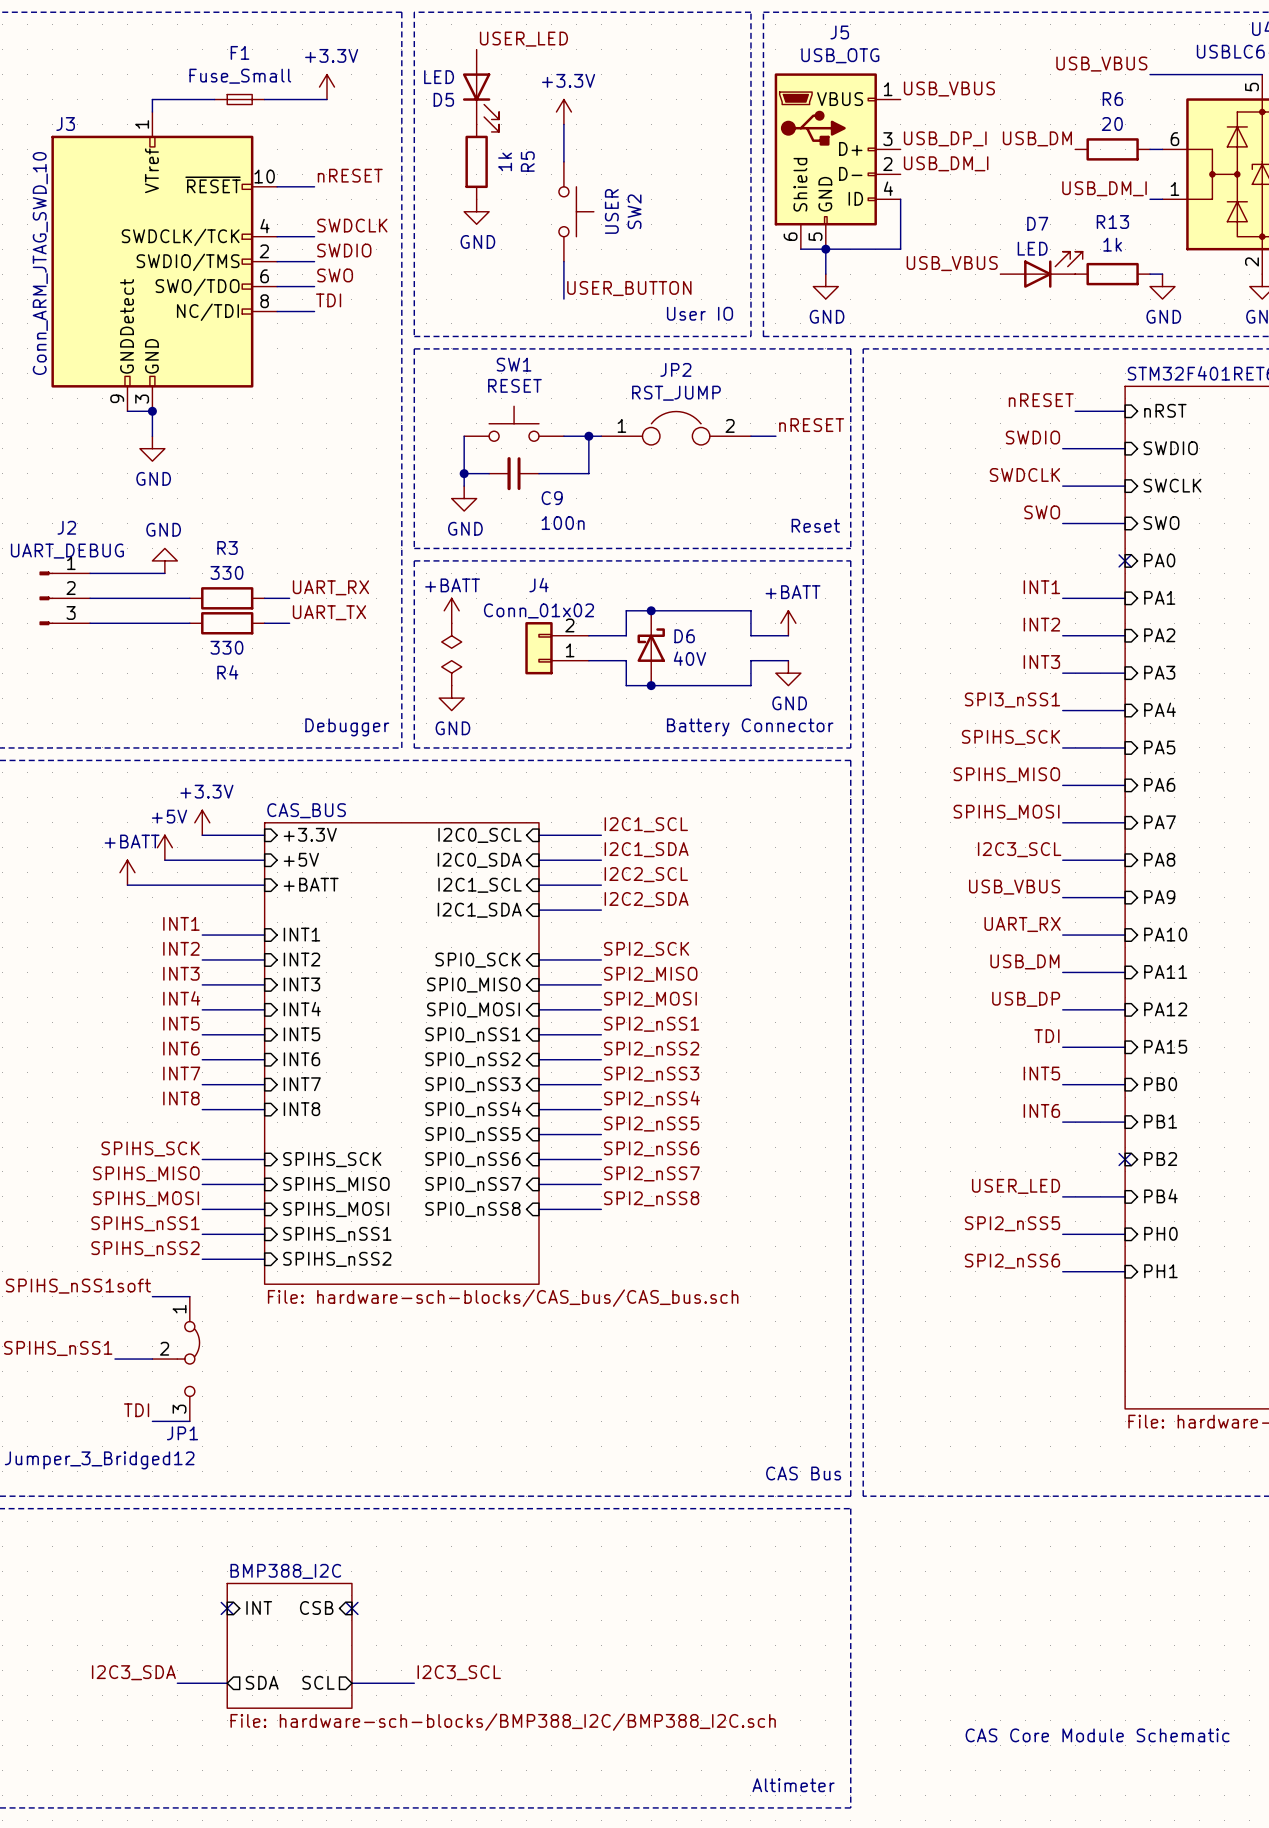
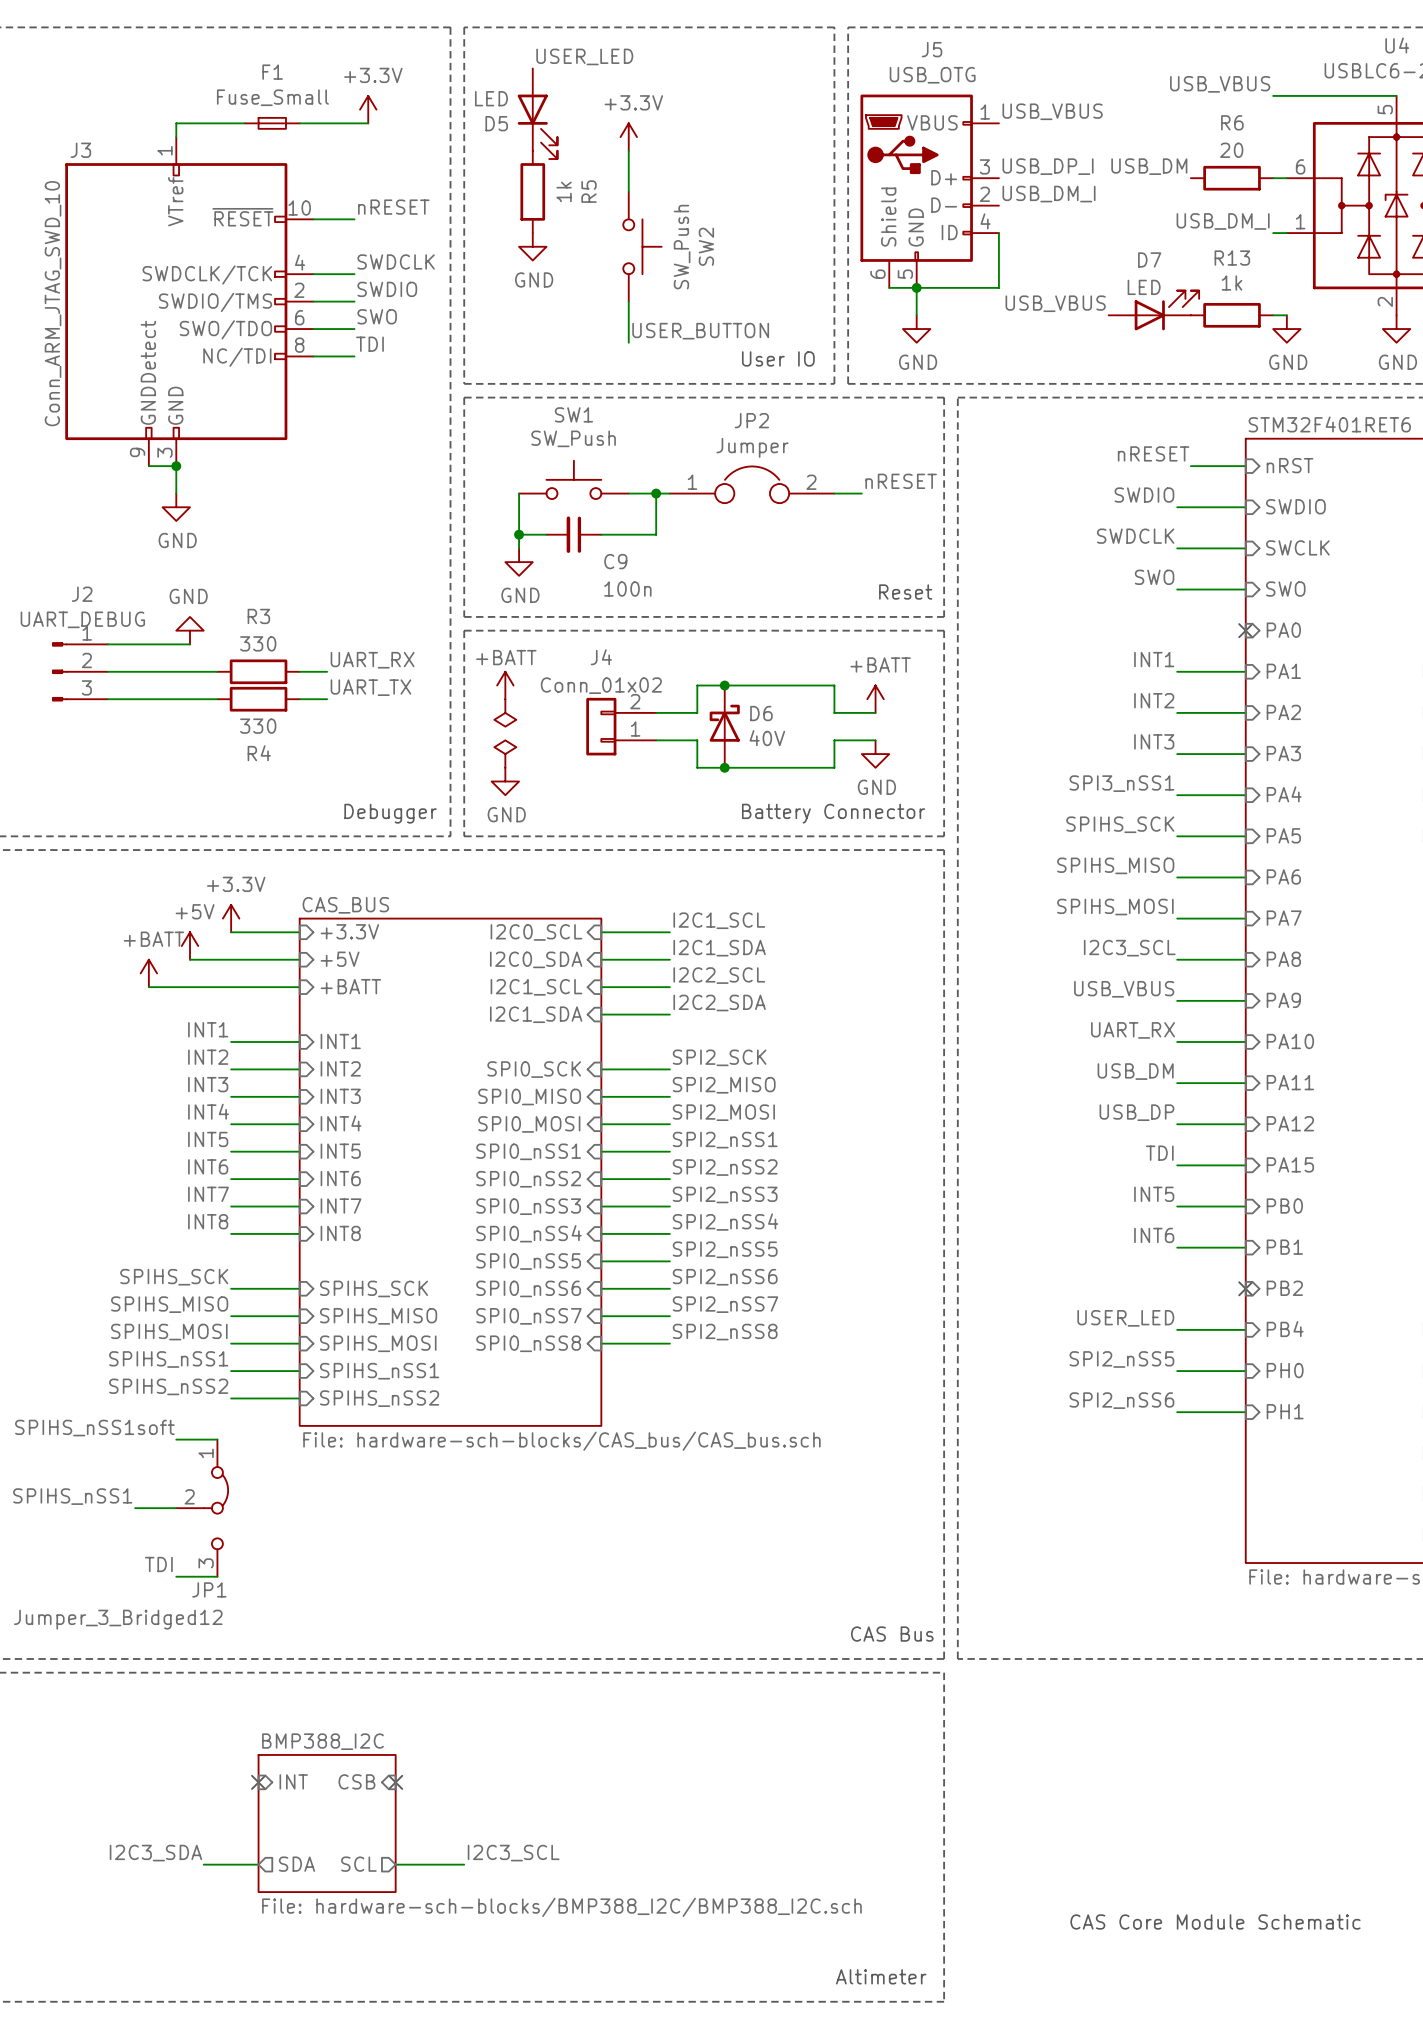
SW2 value: USER (611, 211) -> SW_Push (682, 247)
SW1 value: RESET (514, 385) -> SW_Push (573, 438)
JP2 value: RST_JUMP (676, 393) -> Jumper (752, 447)

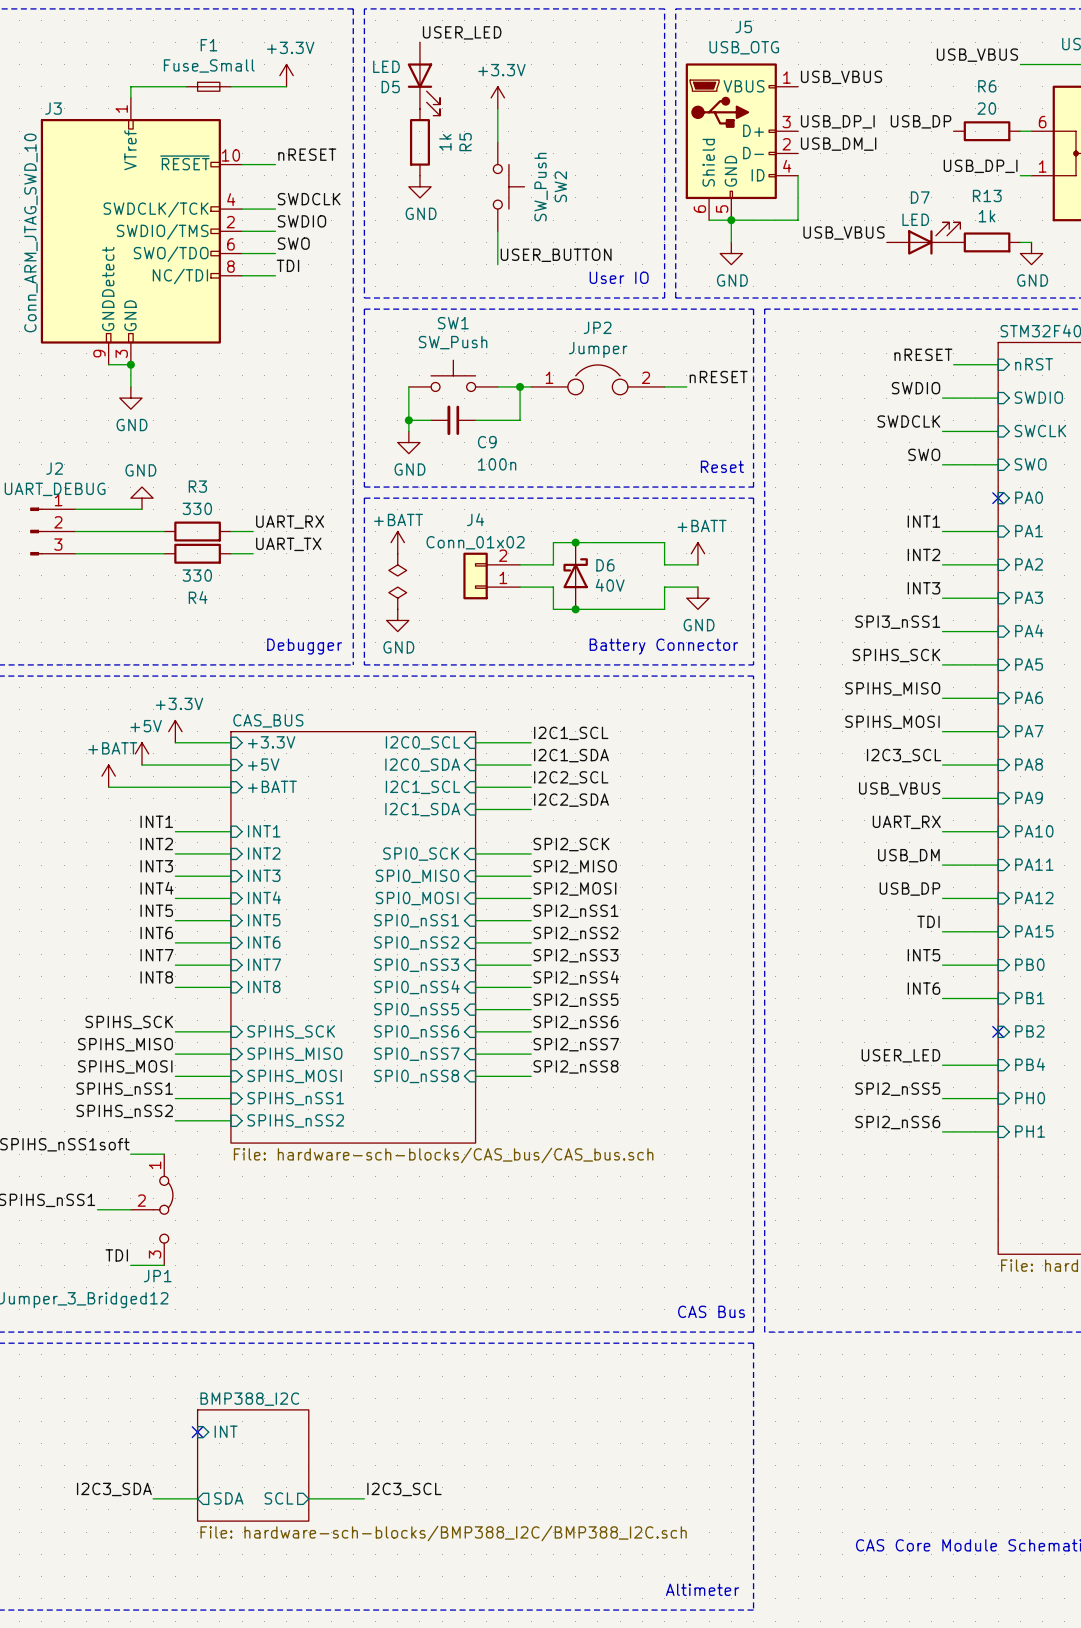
label: USB_DM (1149, 166) -> USB_DP (921, 121)
label: USB_DM_I (1223, 221) -> USB_DP_I (980, 166)
sheet pin: CSB (356, 1781) -> none
no-connect mark: (395, 1782) -> none

